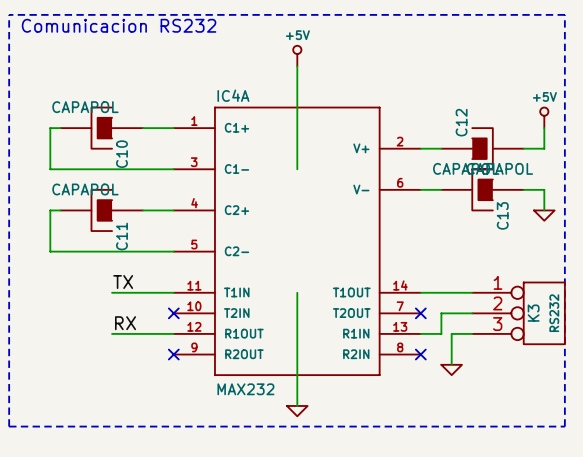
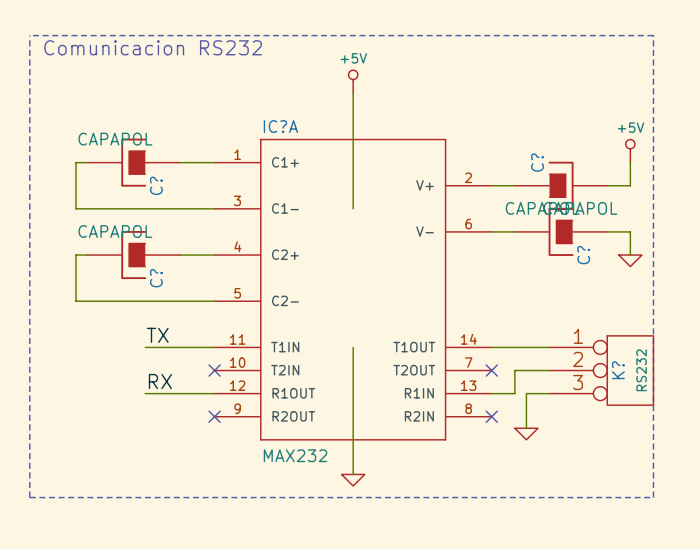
IC4A name: IC4A (233, 95) -> IC?A (280, 126)
C12 name: C12 (461, 122) -> C? (537, 162)
C10 name: C10 (121, 154) -> C? (156, 185)
C13 name: C13 (502, 215) -> C? (583, 255)
C11 name: C11 (121, 236) -> C? (156, 278)
K3 name: K3 (533, 313) -> K? (618, 370)

